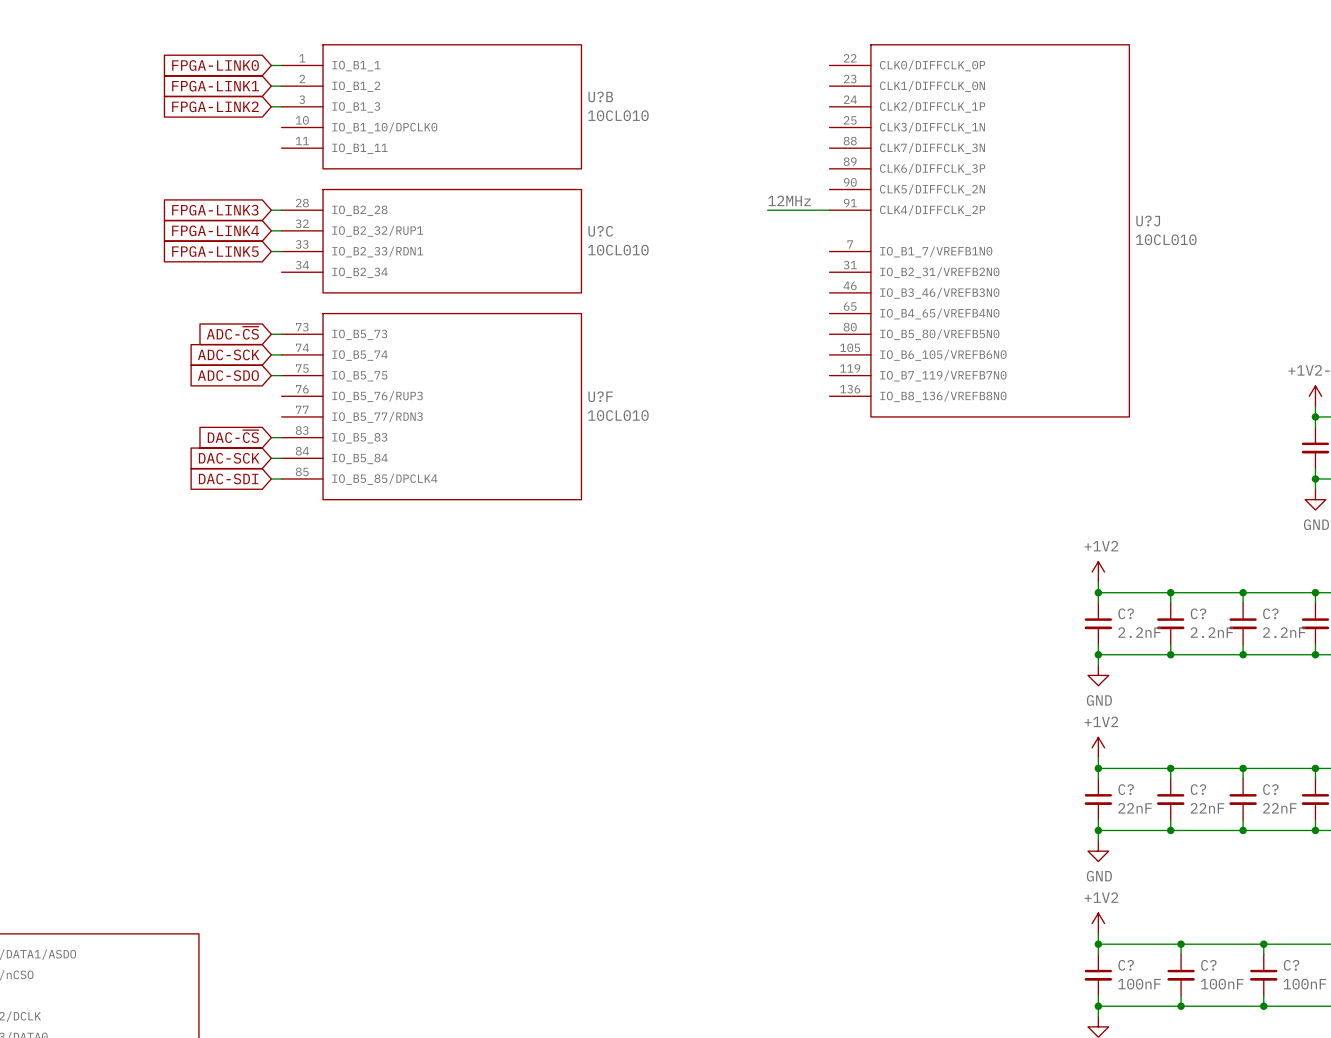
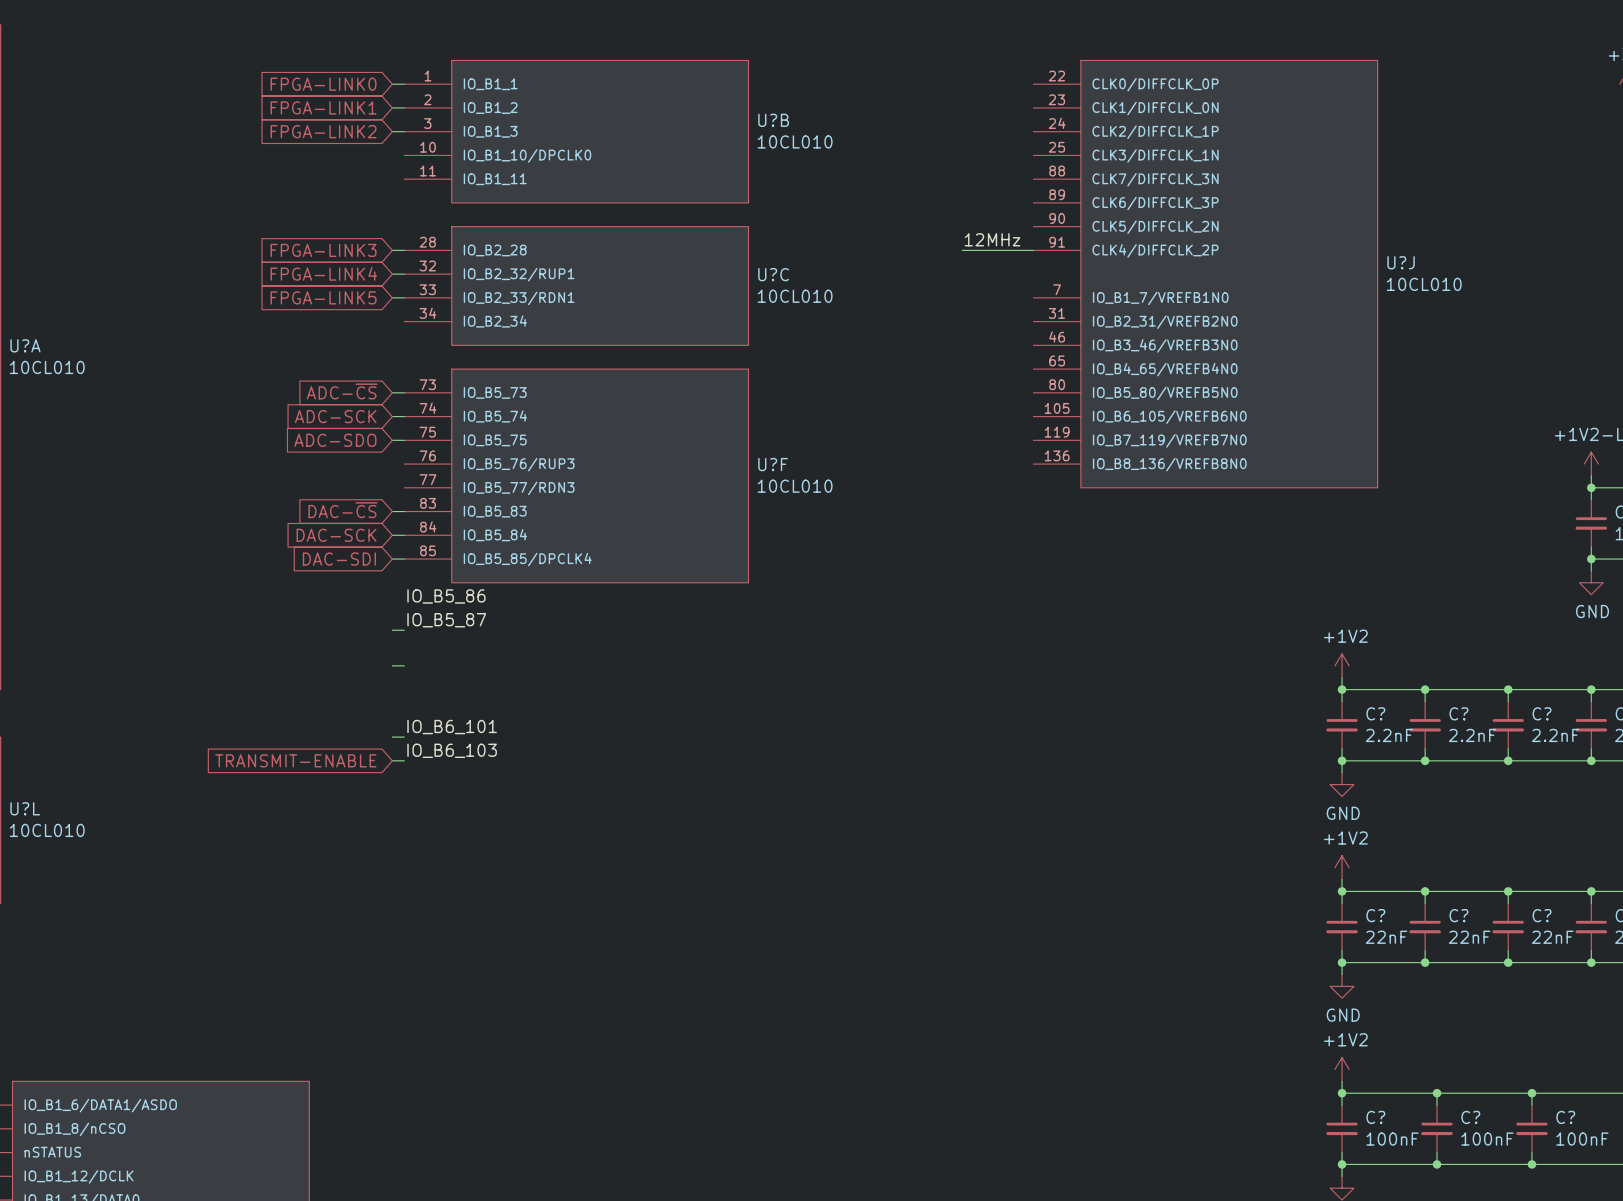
label: none -> IO_B5_86 (446, 596)
label: none -> IO_B5_87 (446, 620)
wire: none -> (392, 630) (404, 630)
wire: none -> (392, 665) (404, 665)
label: none -> IO_B6_101 (452, 727)
wire: none -> (392, 737) (404, 737)
label: none -> IO_B6_103 (452, 750)
global label: none -> TRANSMIT-ENABLE (295, 760)
wire: none -> (392, 760) (404, 760)

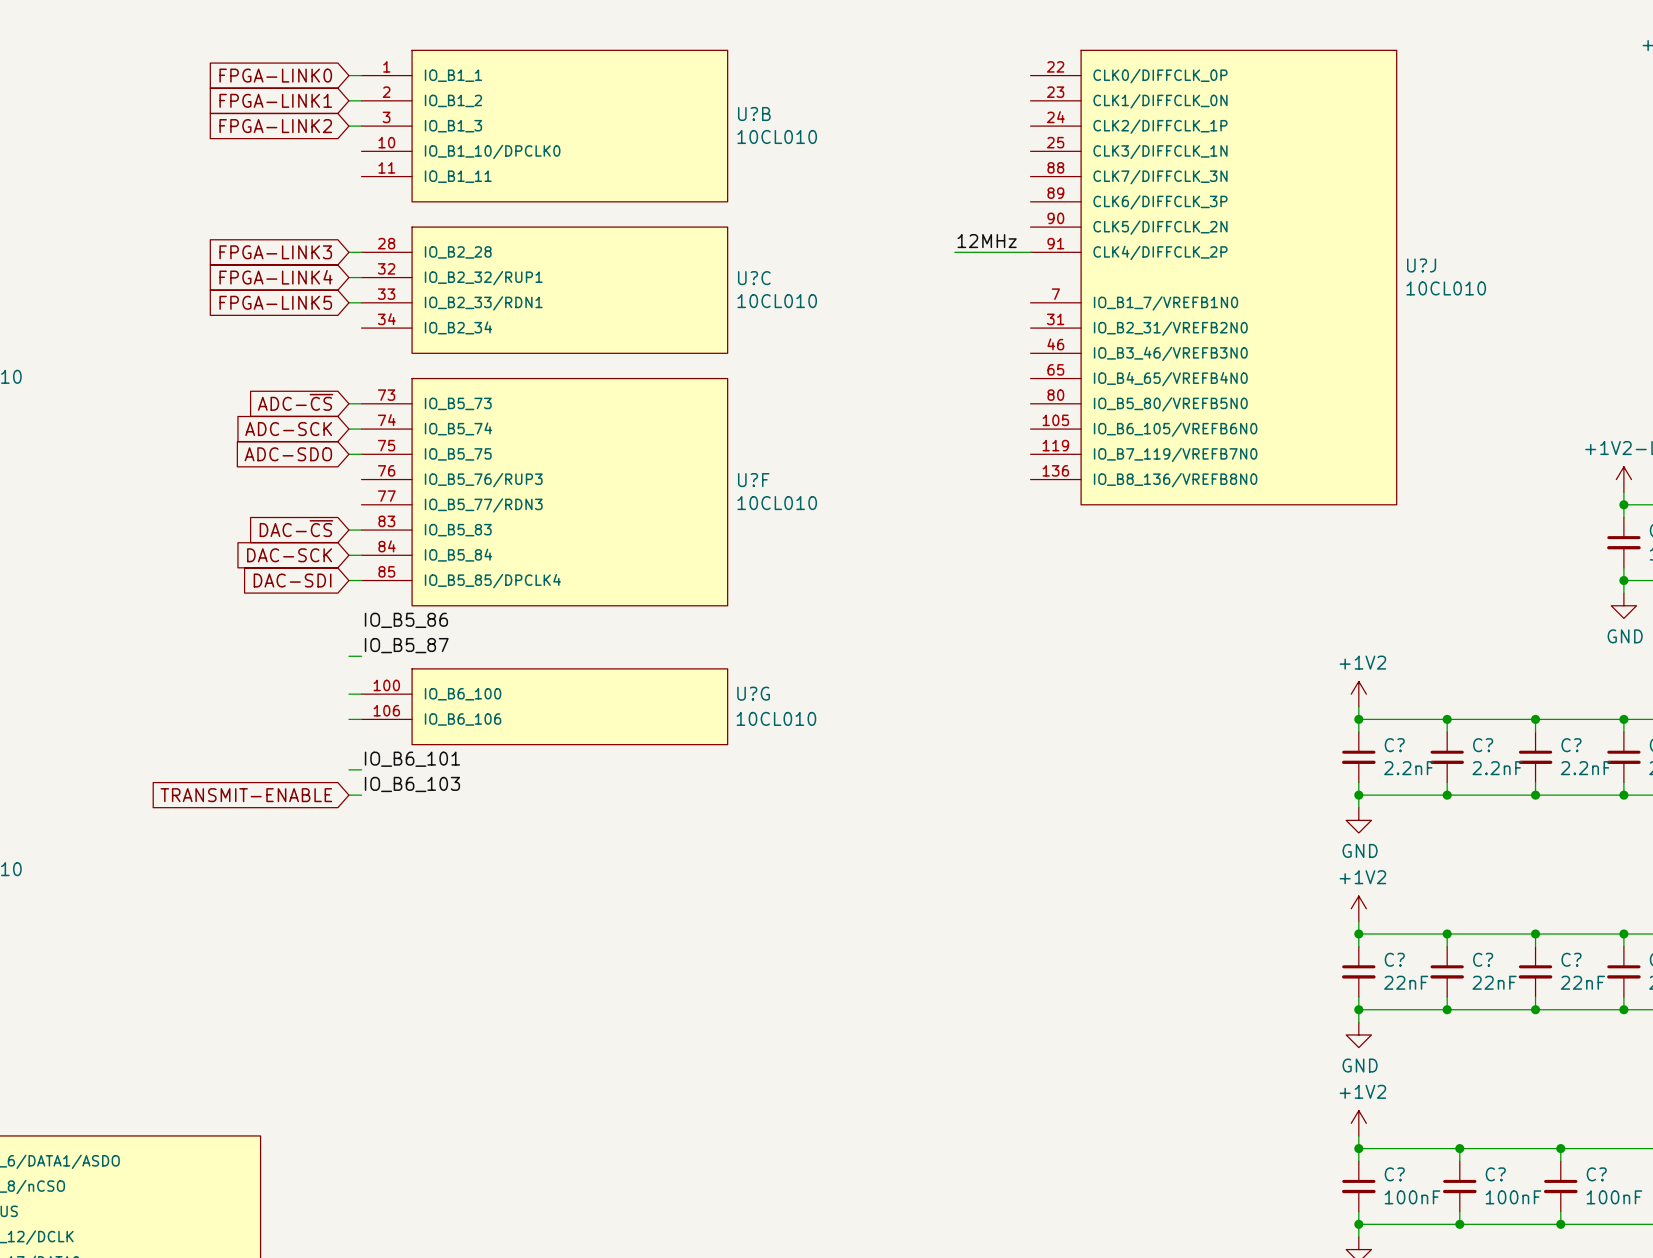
U?G: none -> 10CL010 (544, 706)
wire: none -> (348, 719) (361, 719)

